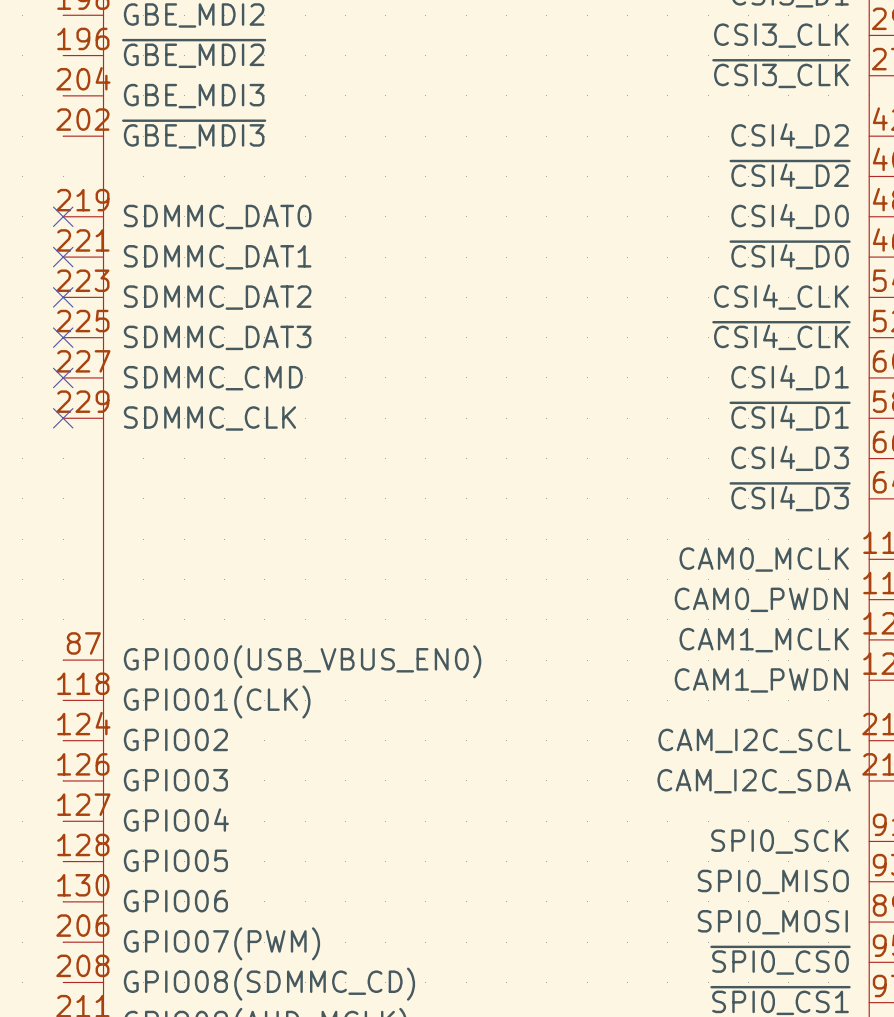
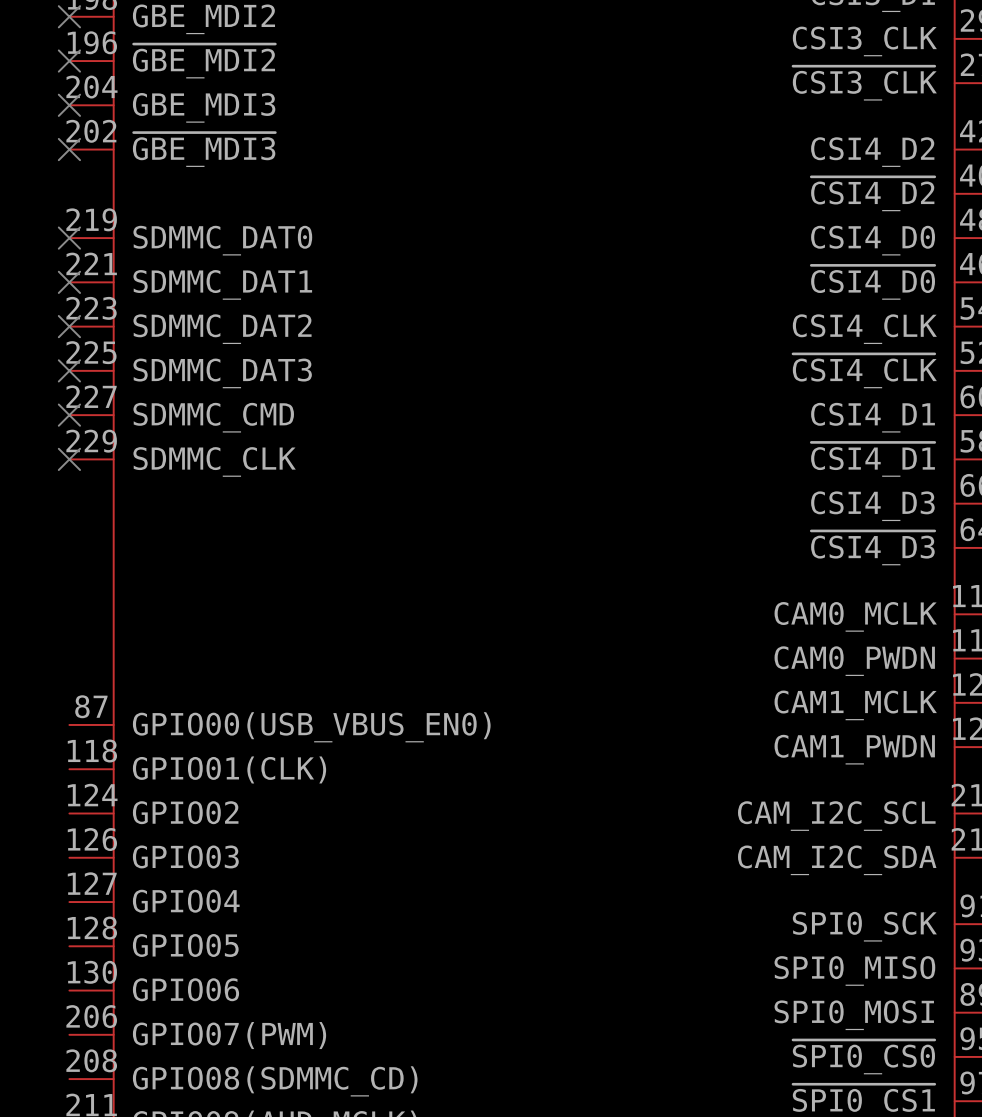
no-connect mark: none -> (69, 16)
no-connect mark: none -> (69, 61)
no-connect mark: none -> (69, 105)
no-connect mark: none -> (69, 149)

